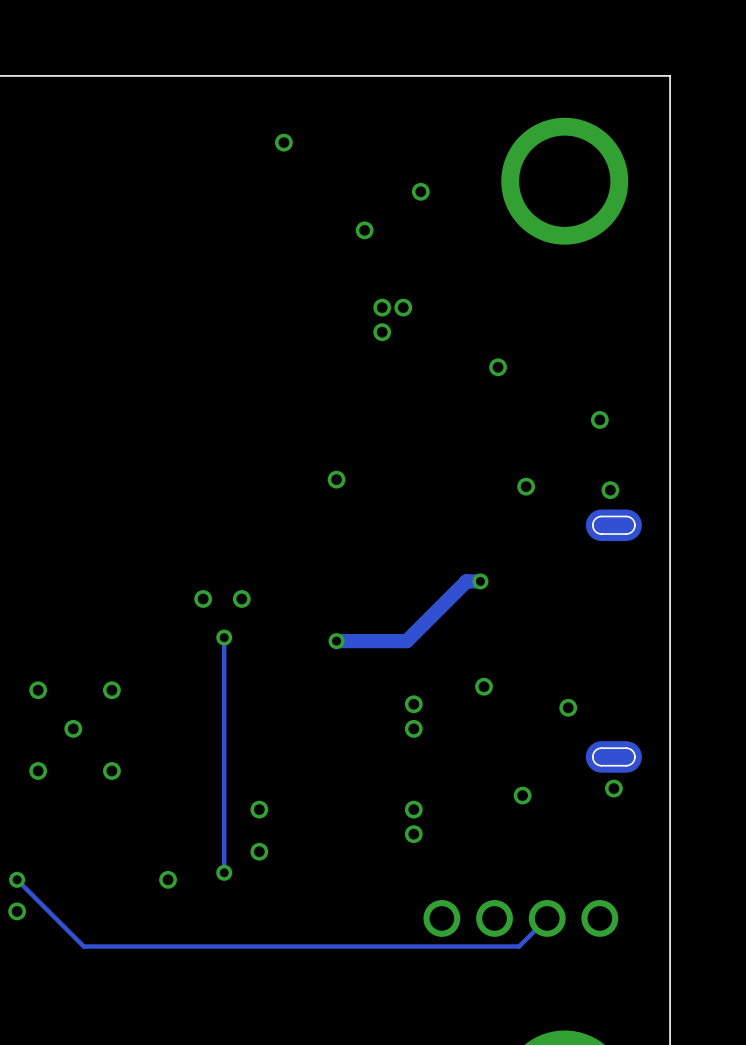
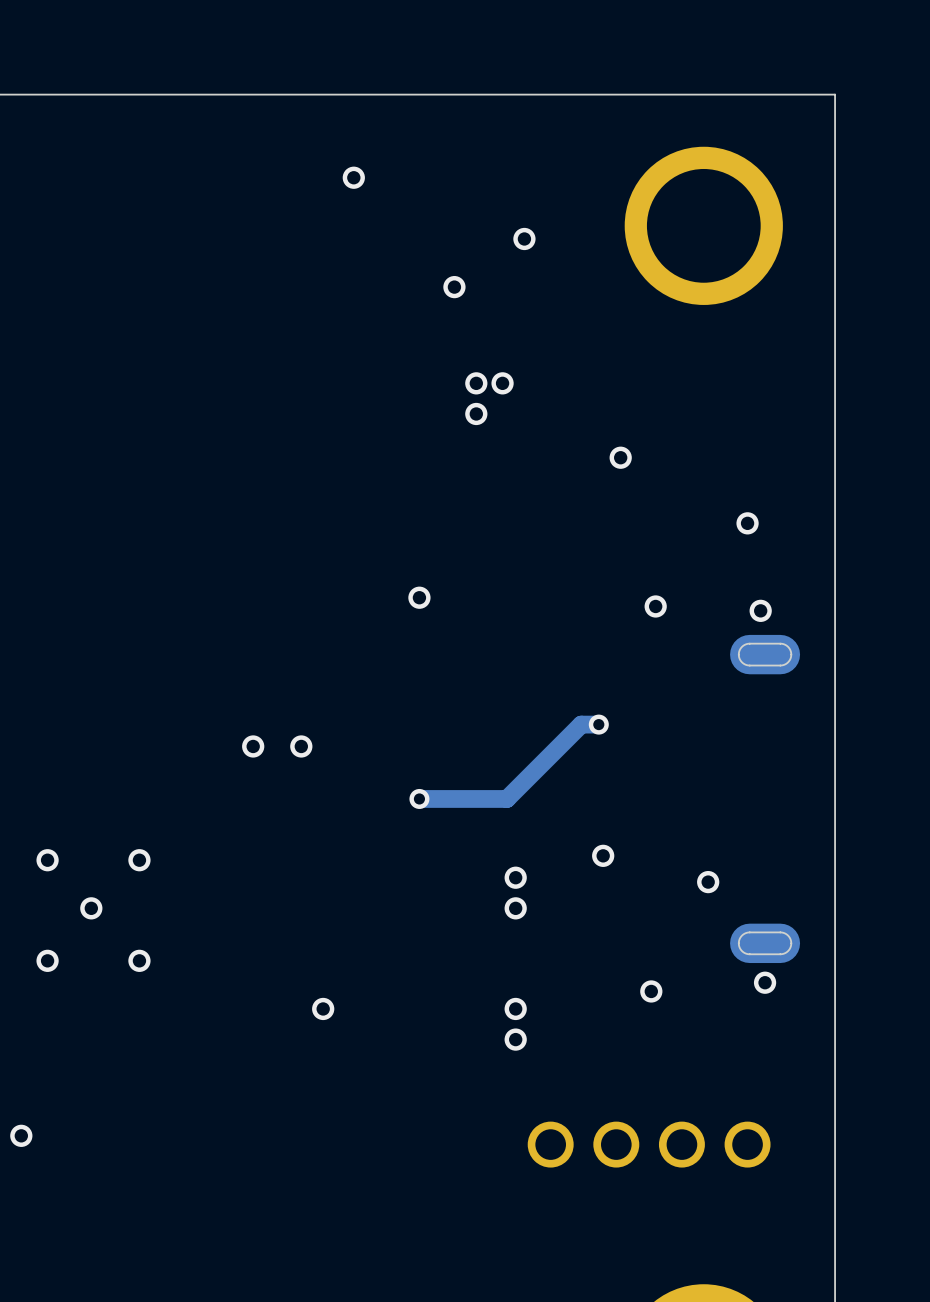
track: (224, 637) (224, 872) -> none
via: (224, 637) -> none
via: (259, 851) -> none
via: (224, 872) -> none
track: (17, 879) (83, 946) (519, 946) (547, 918) -> none
via: (17, 879) -> none
via: (168, 879) -> none

